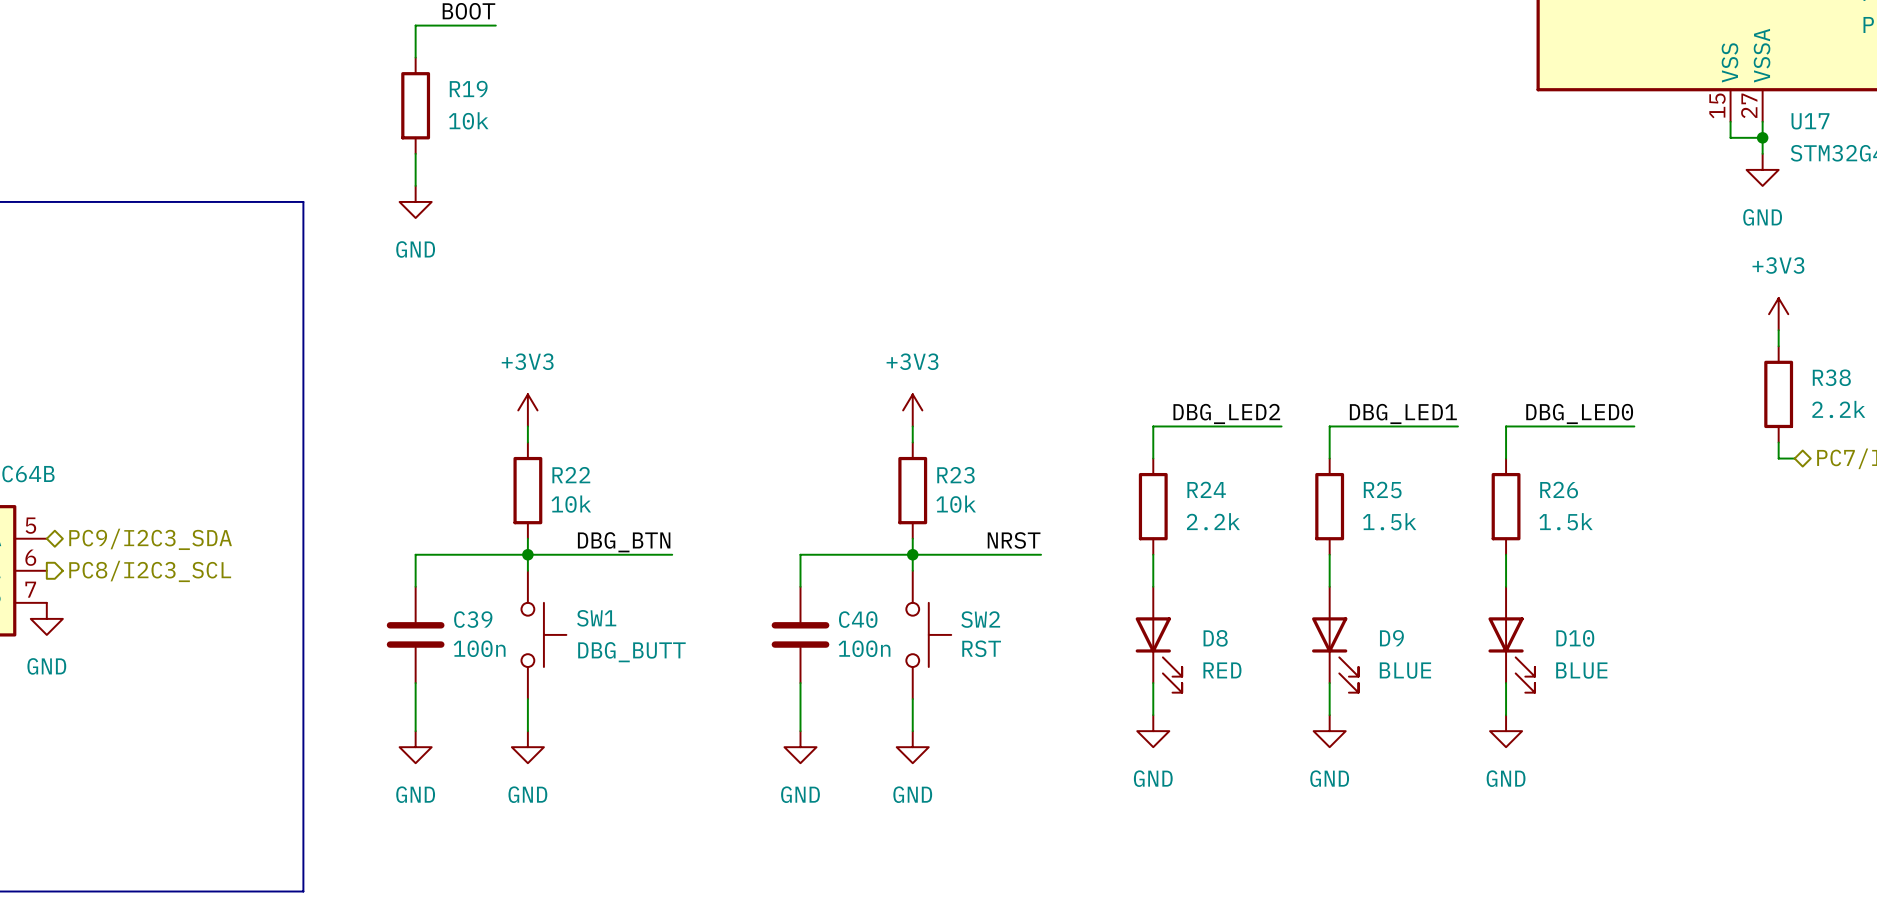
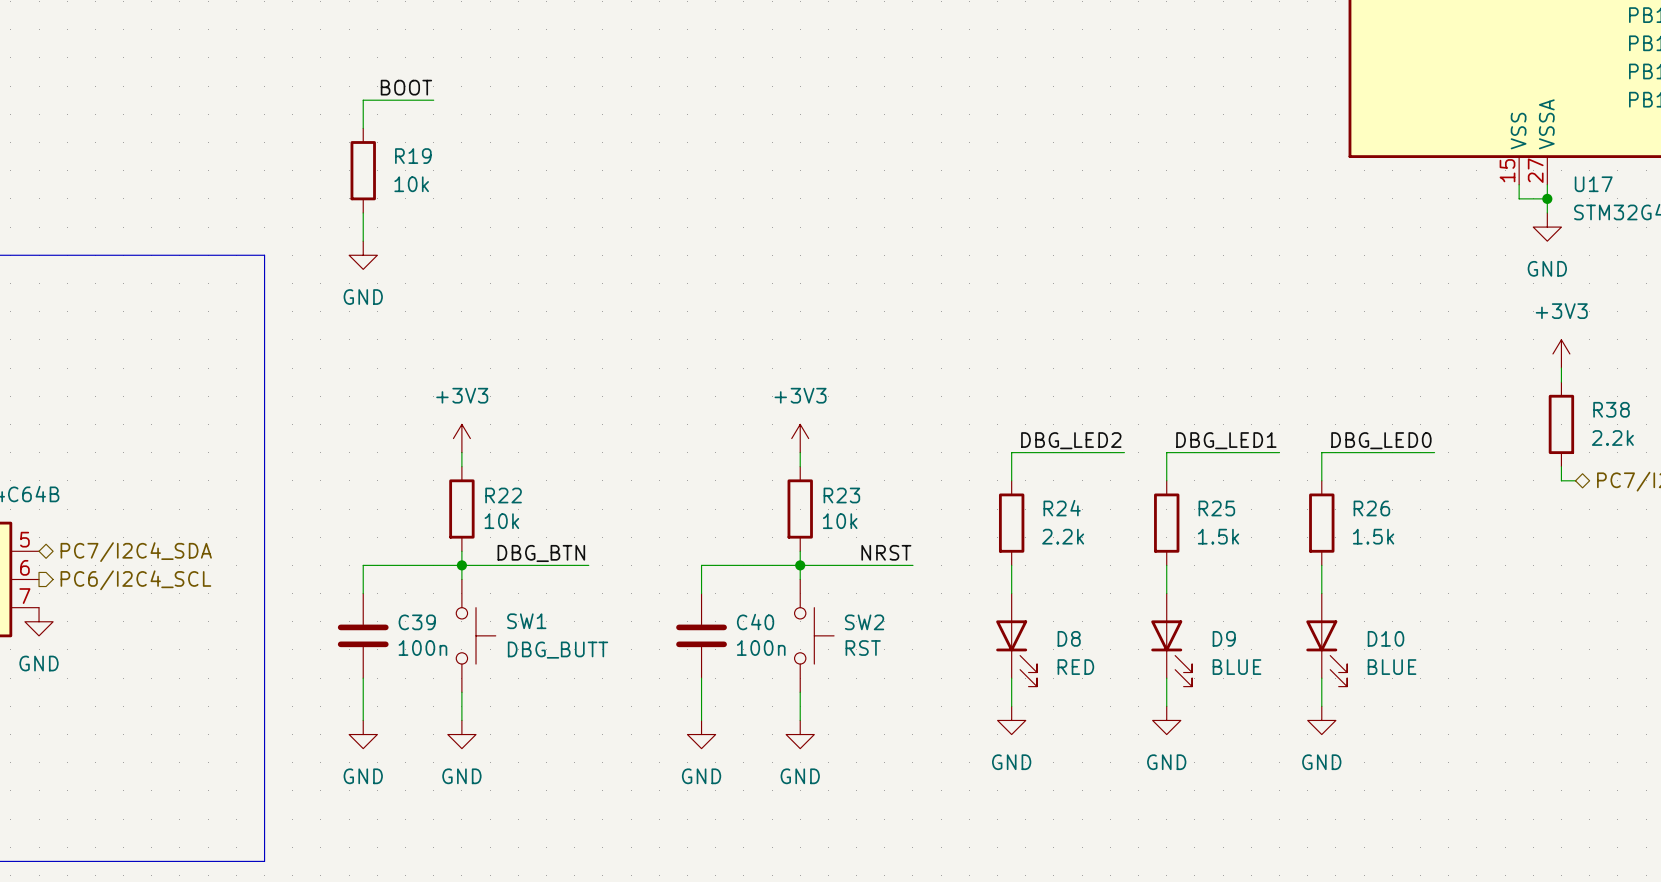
hierarchical label: PC9/I2C3_SDA (150, 539) -> PC7/I2C4_SDA (136, 552)
hierarchical label: PC8/I2C3_SCL (150, 571) -> PC6/I2C4_SCL (135, 580)

